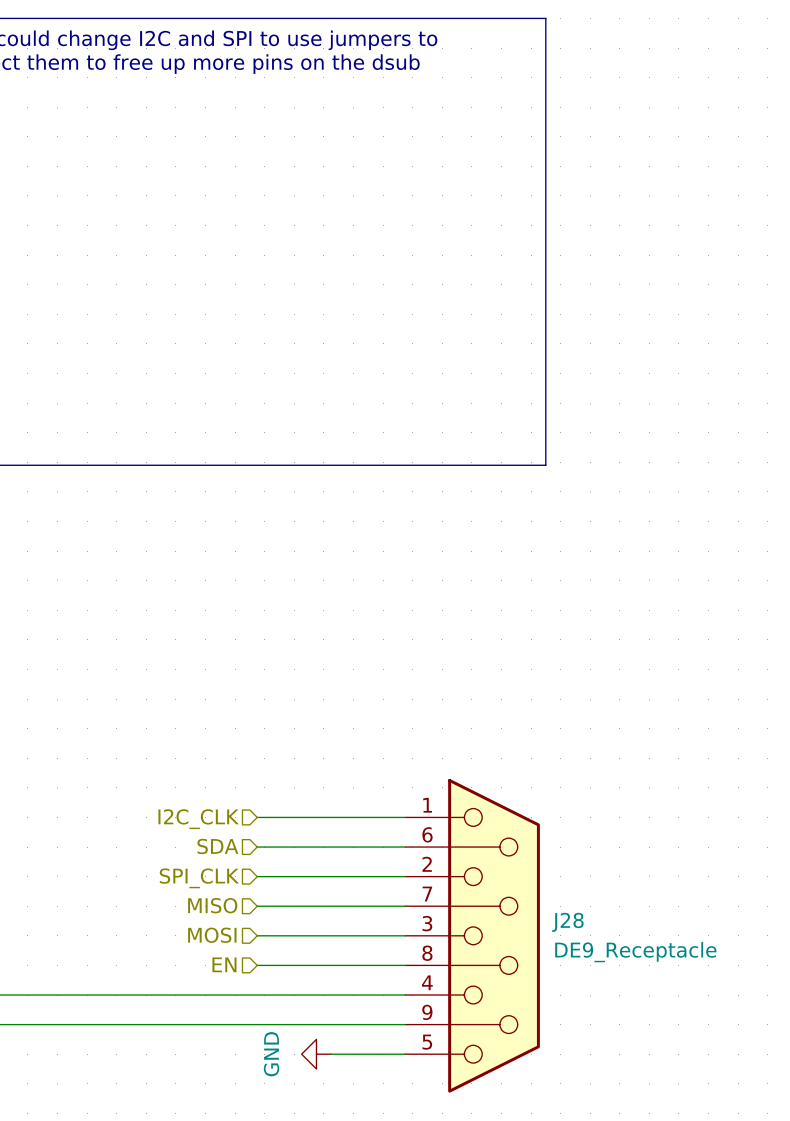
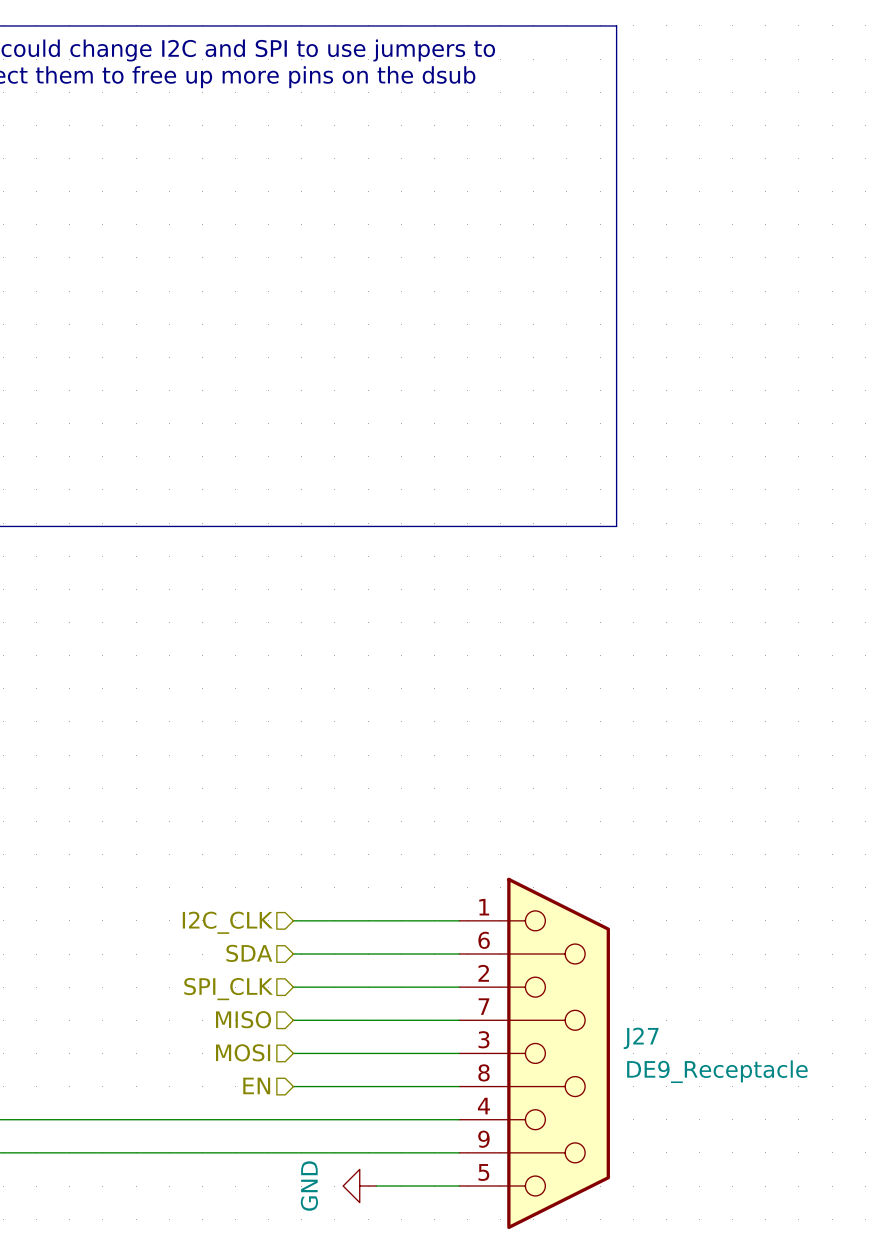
J28 name: J28 (567, 922) -> J27 (641, 1038)

